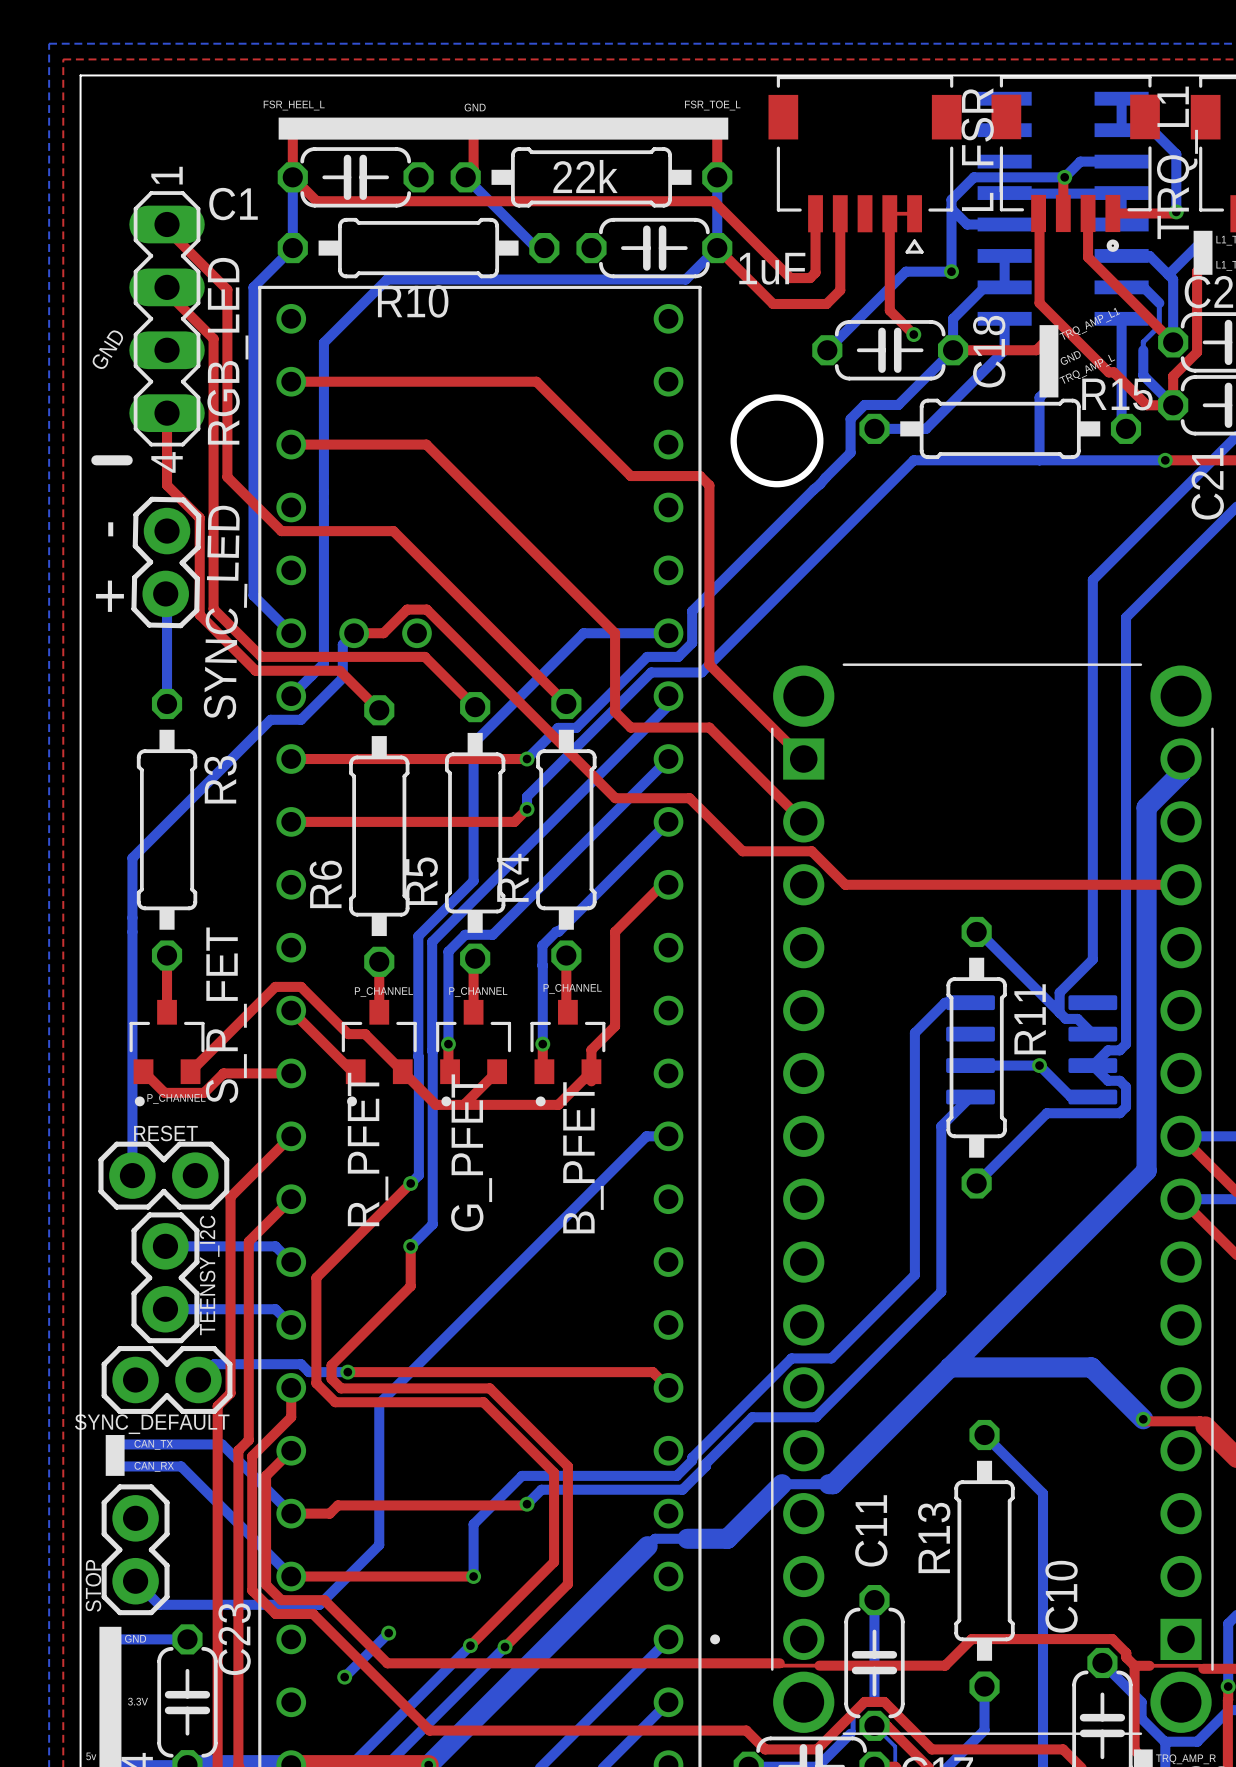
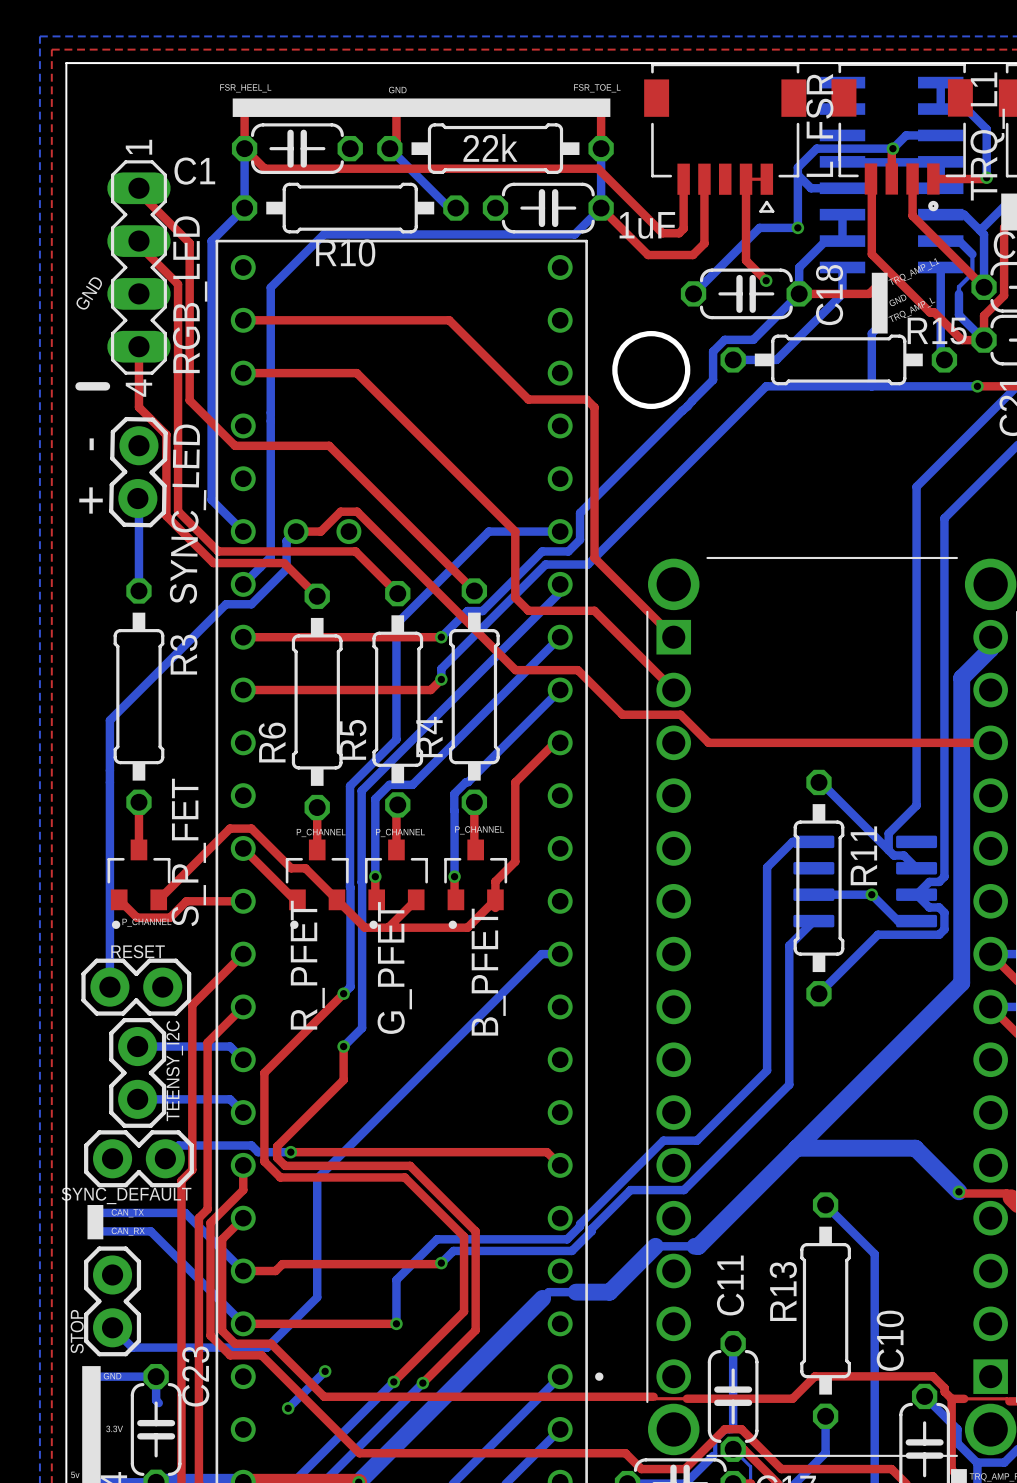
bottom track: none -> (156, 1376) (156, 1400) (158, 1403)

